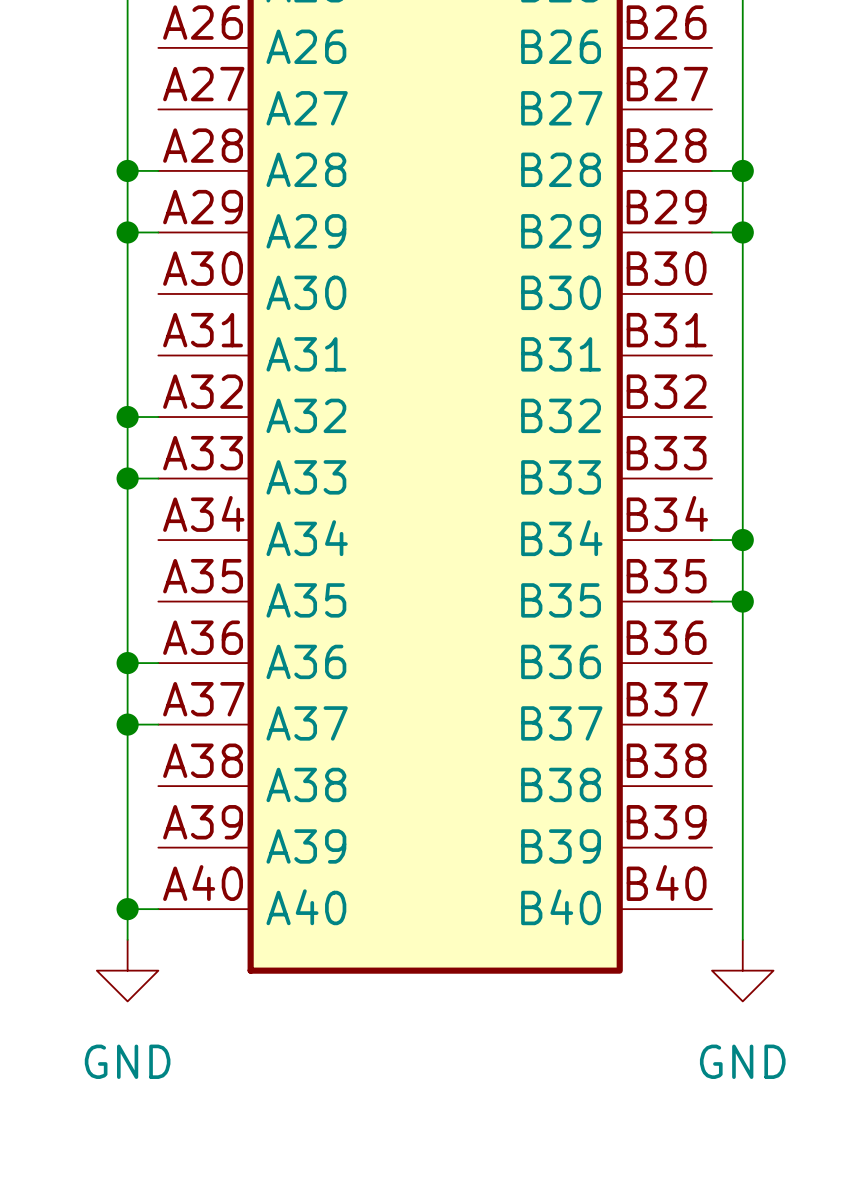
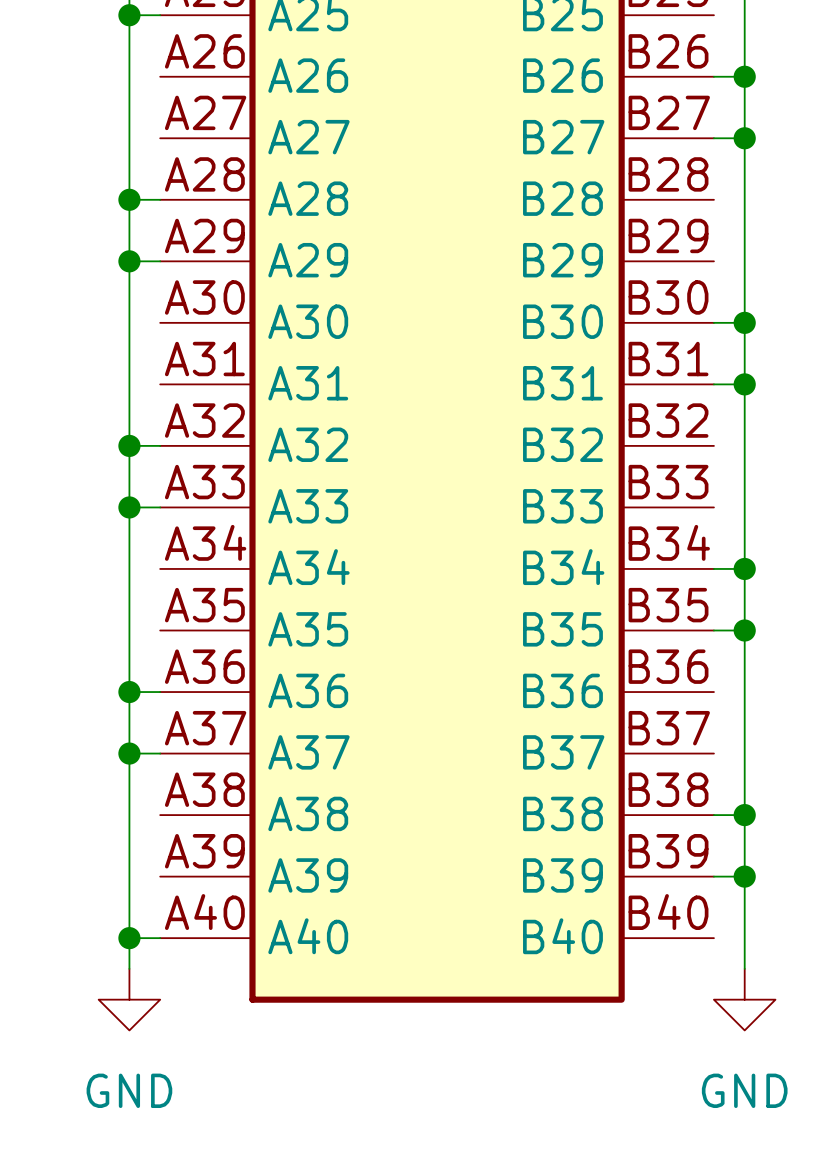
junction: none -> (744, 76)
junction: none -> (744, 138)
wire: (712, 170) (742, 170) -> (713, 76) (744, 76)
junction: (742, 170) -> none
wire: (712, 232) (742, 232) -> (713, 138) (744, 138)
junction: (742, 232) -> none
wire: none -> (713, 322) (744, 322)
junction: none -> (744, 322)
wire: none -> (713, 384) (744, 384)
junction: none -> (744, 384)
wire: none -> (713, 815) (744, 815)
junction: none -> (744, 815)
wire: none -> (713, 876) (744, 876)
junction: none -> (744, 876)

